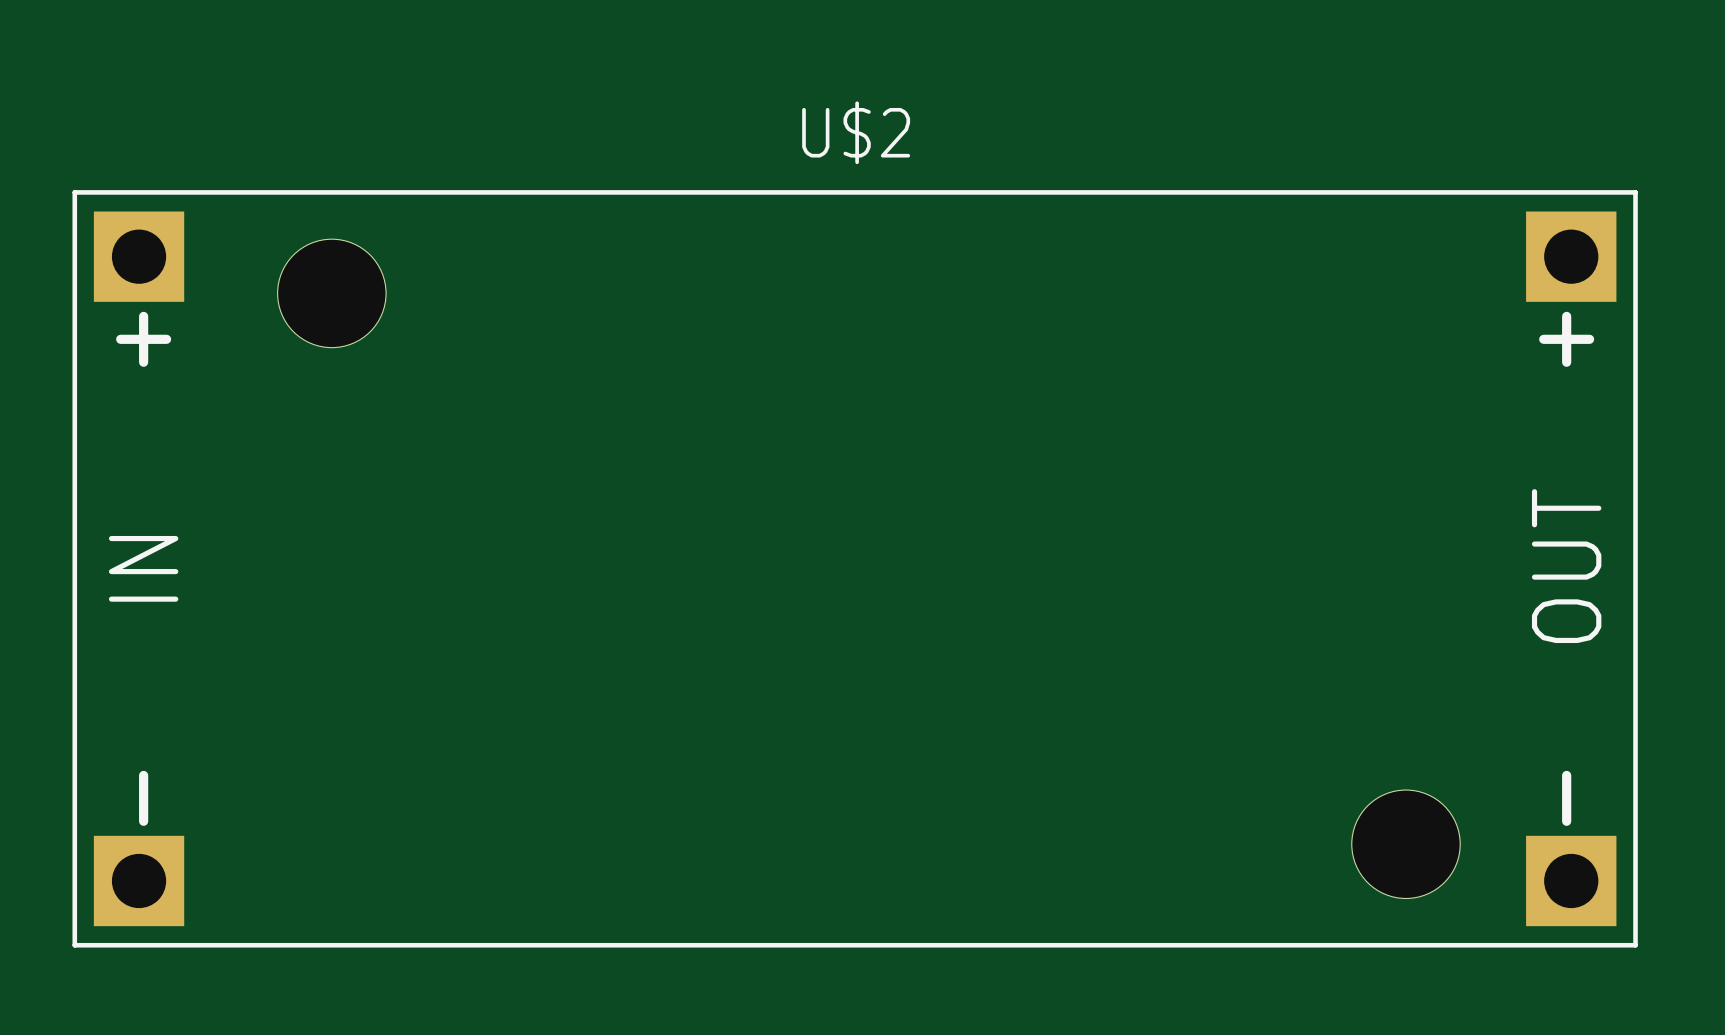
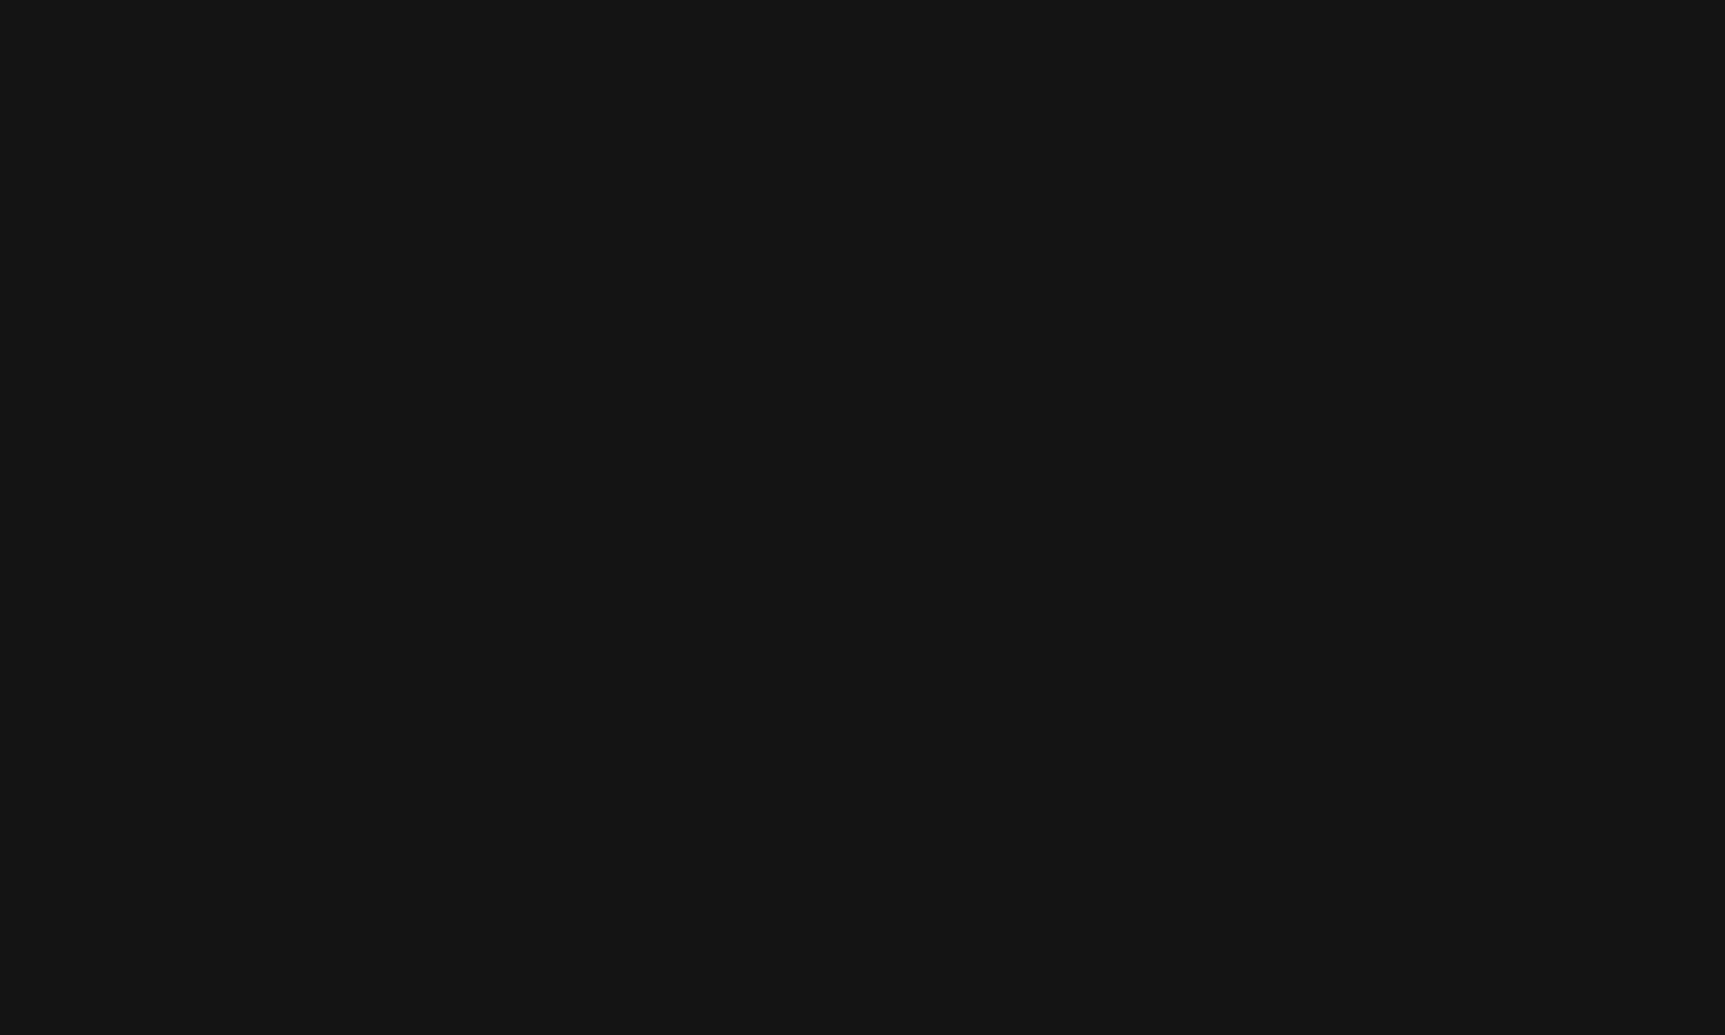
U$2: (855, 568) -> none

